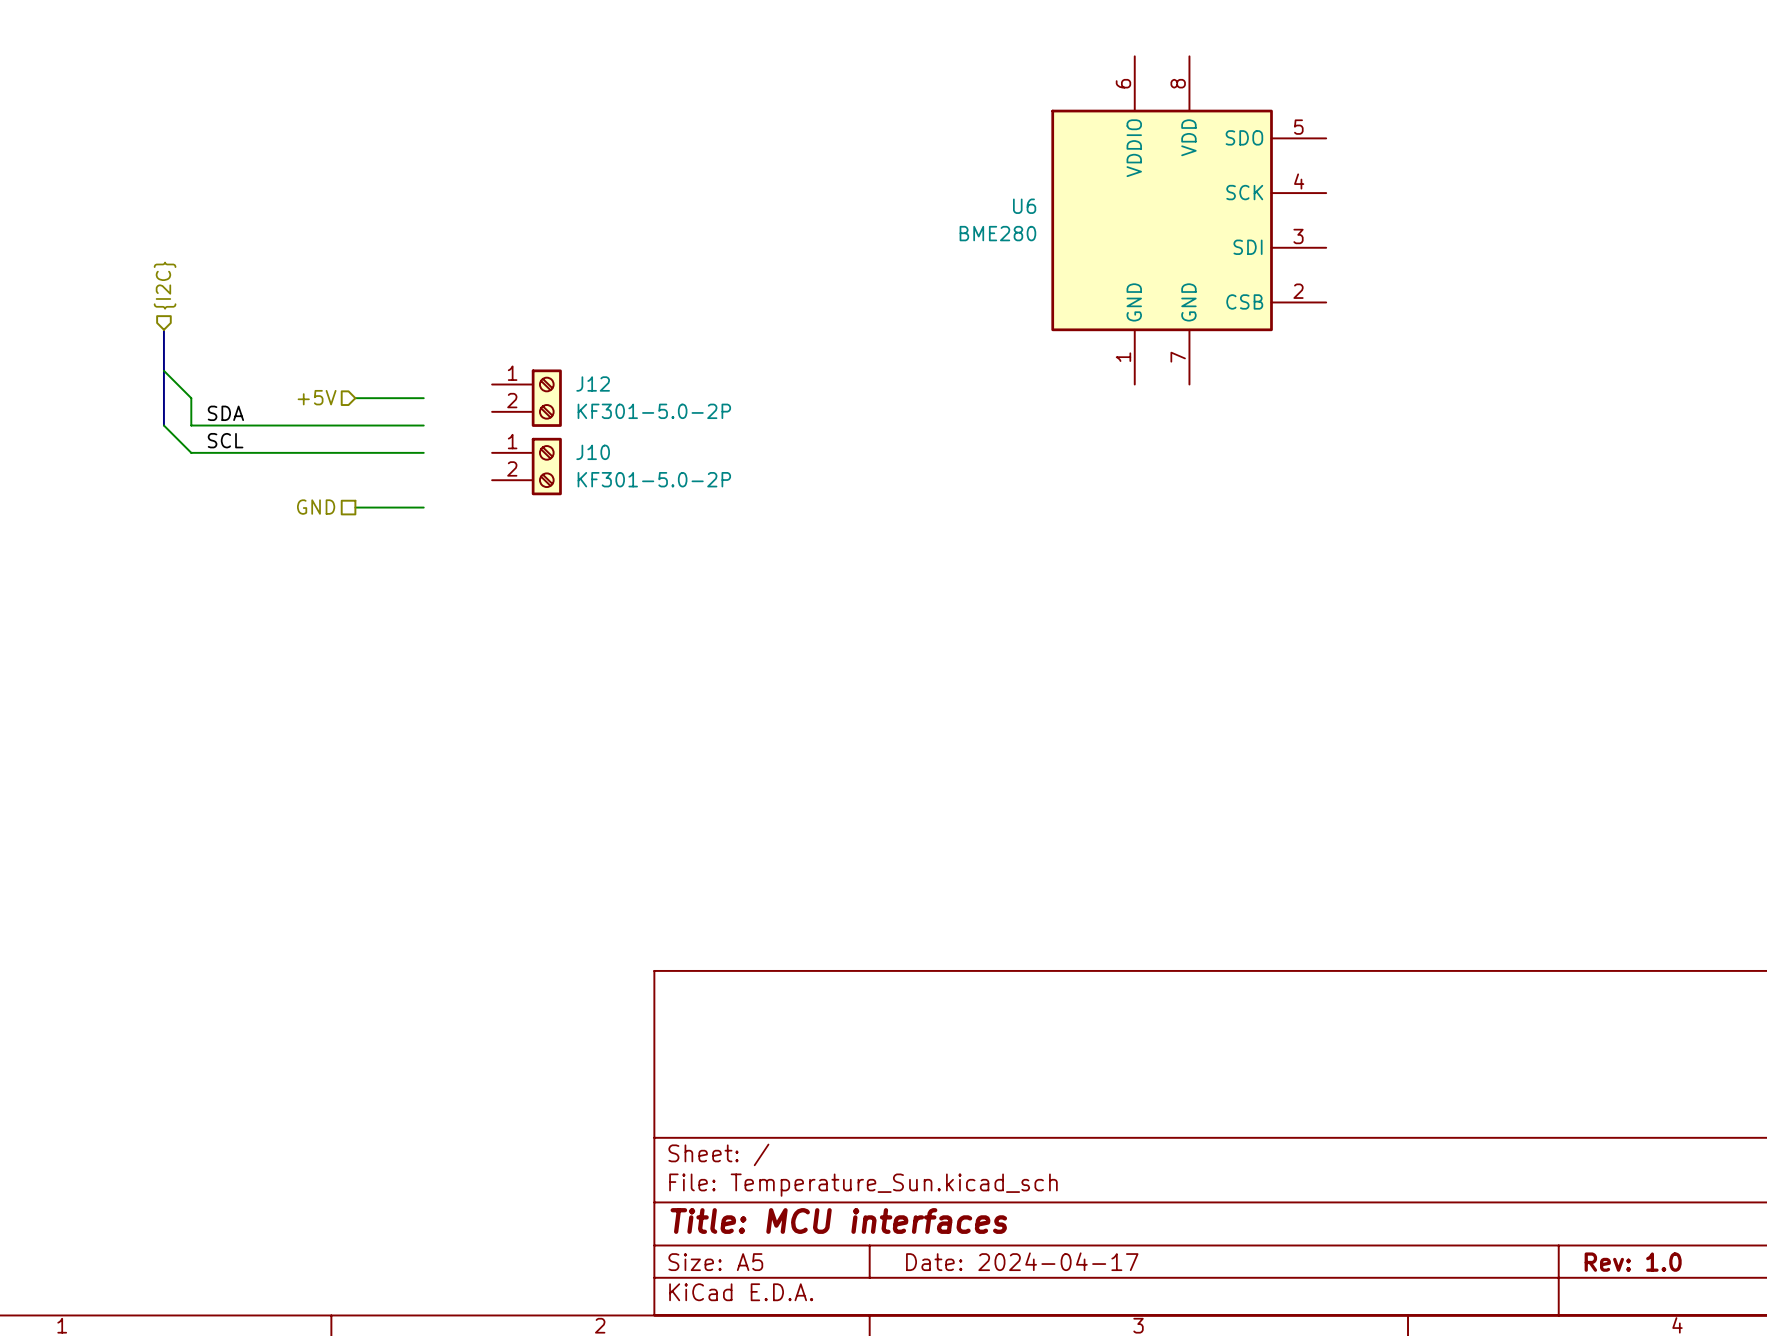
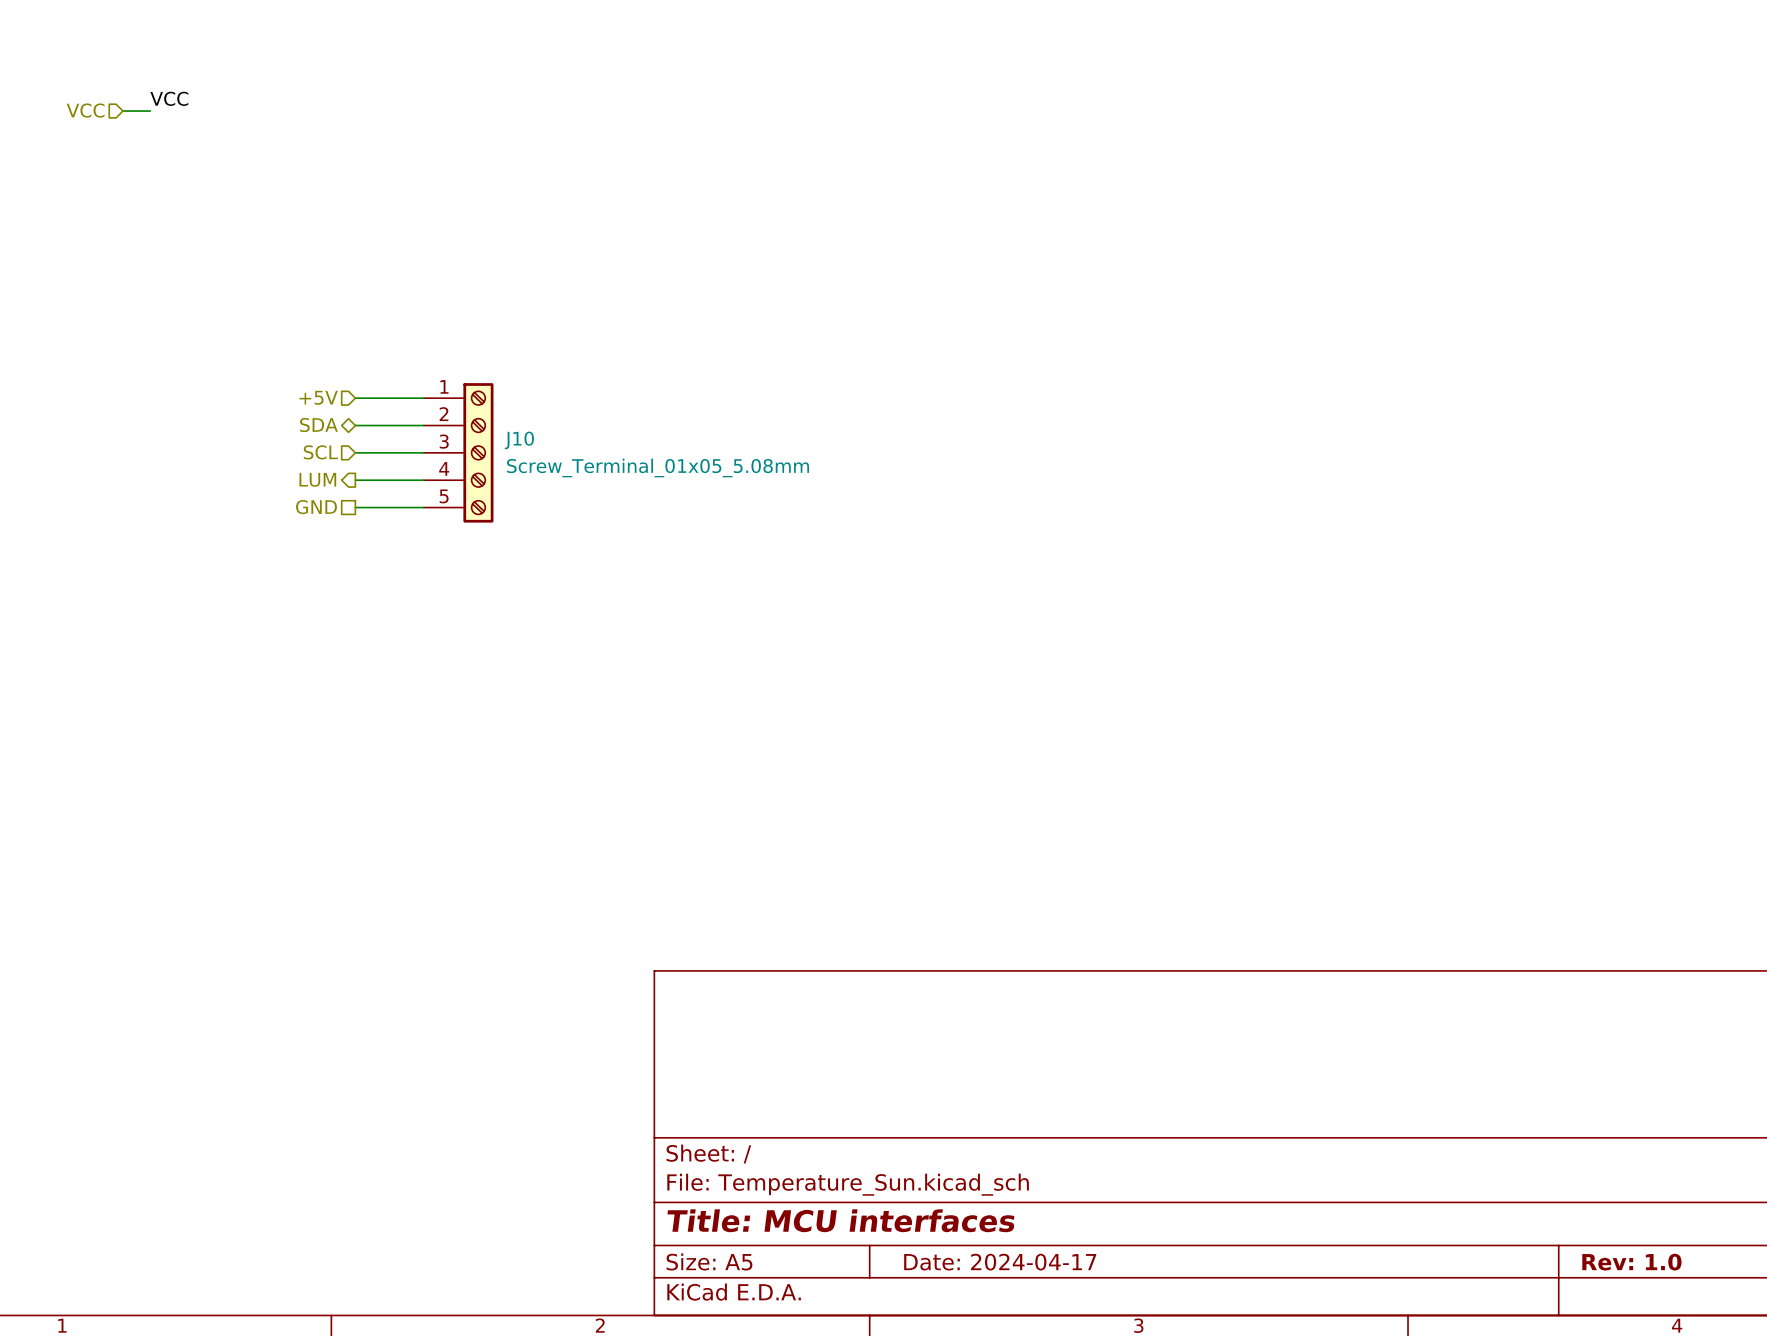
label: none -> VCC (169, 98)
hierarchical label: none -> VCC (85, 110)
wire: none -> (122, 111) (150, 111)
U6: BME280 (1188, 220) -> none
hierarchical label: {I2C} (165, 285) -> none
bus: (163, 329) (163, 425) -> none
wire: (163, 370) (191, 398) (191, 425) (355, 425) -> none
J12: KF301-5.0-2P (526, 398) -> none
label: SDA (225, 413) -> none
wire: (163, 425) (191, 452) (355, 452) -> none
hierarchical label: none -> SDA (318, 425)
J10 symbol: [492, 437, 562, 496] -> [423, 383, 494, 523]
label: SCL (225, 440) -> none
hierarchical label: none -> SCL (320, 452)
hierarchical label: none -> LUM (317, 479)
J10 value: KF301-5.0-2P (654, 479) -> Screw_Terminal_01x05_5.08mm (658, 467)
wire: none -> (355, 480) (423, 480)

